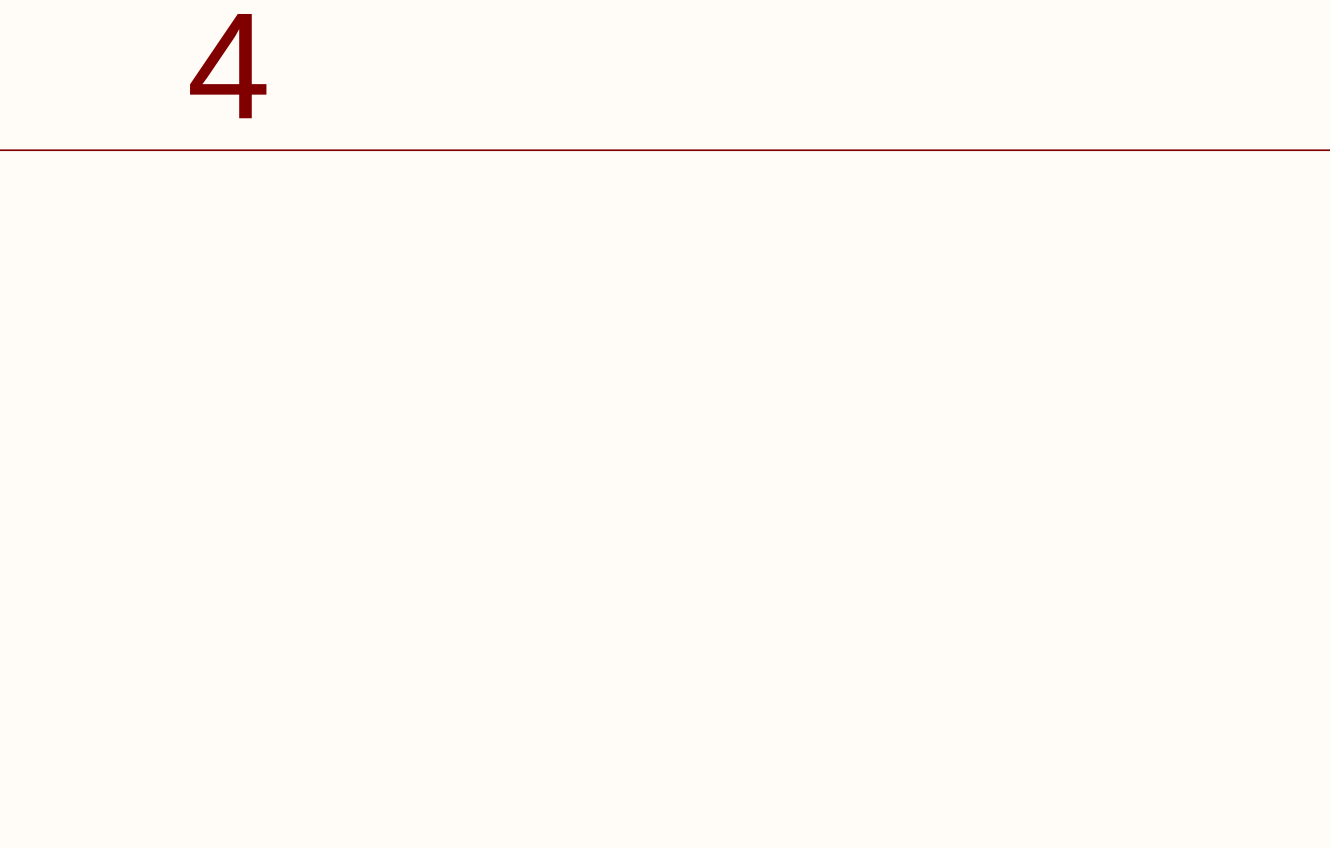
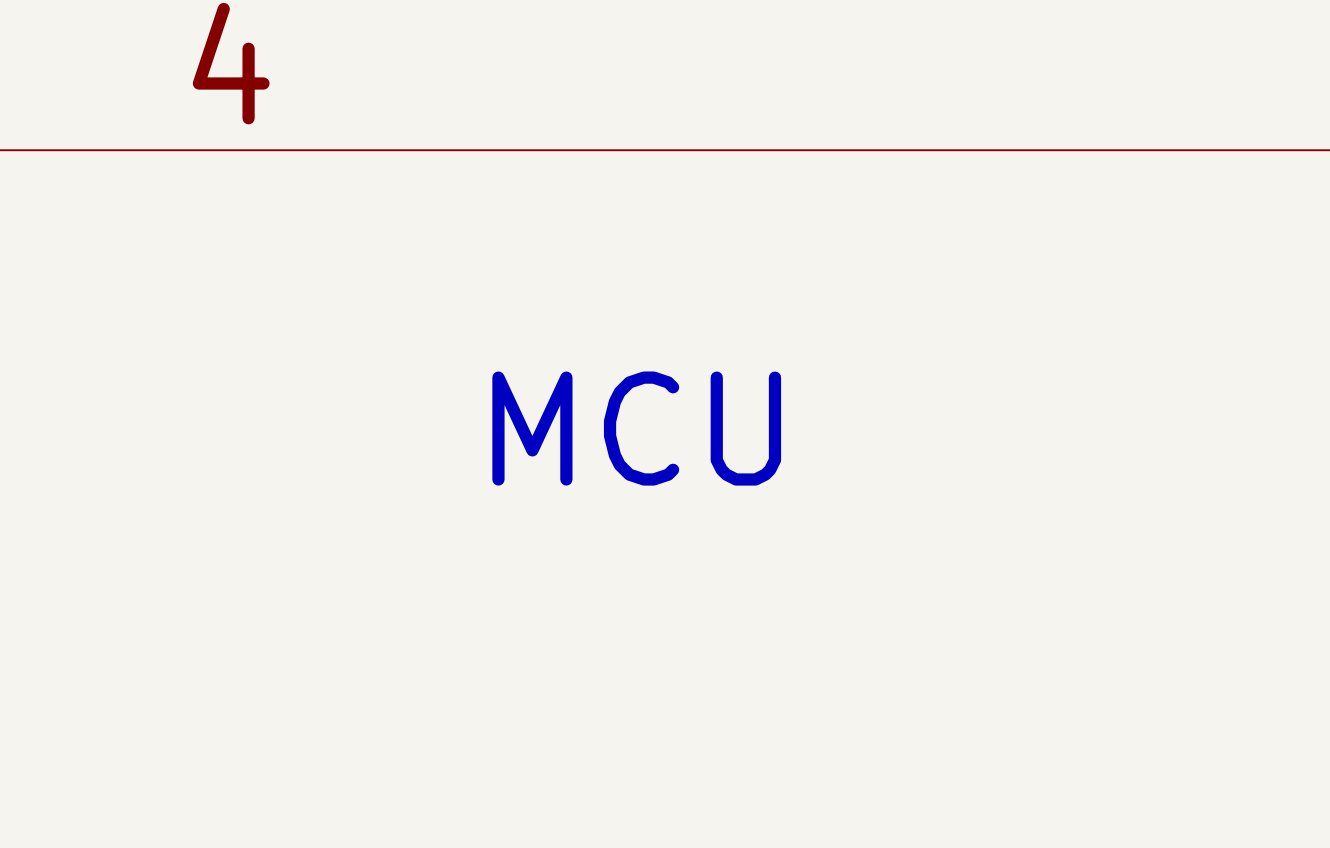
text: none -> MCU (636, 428)

